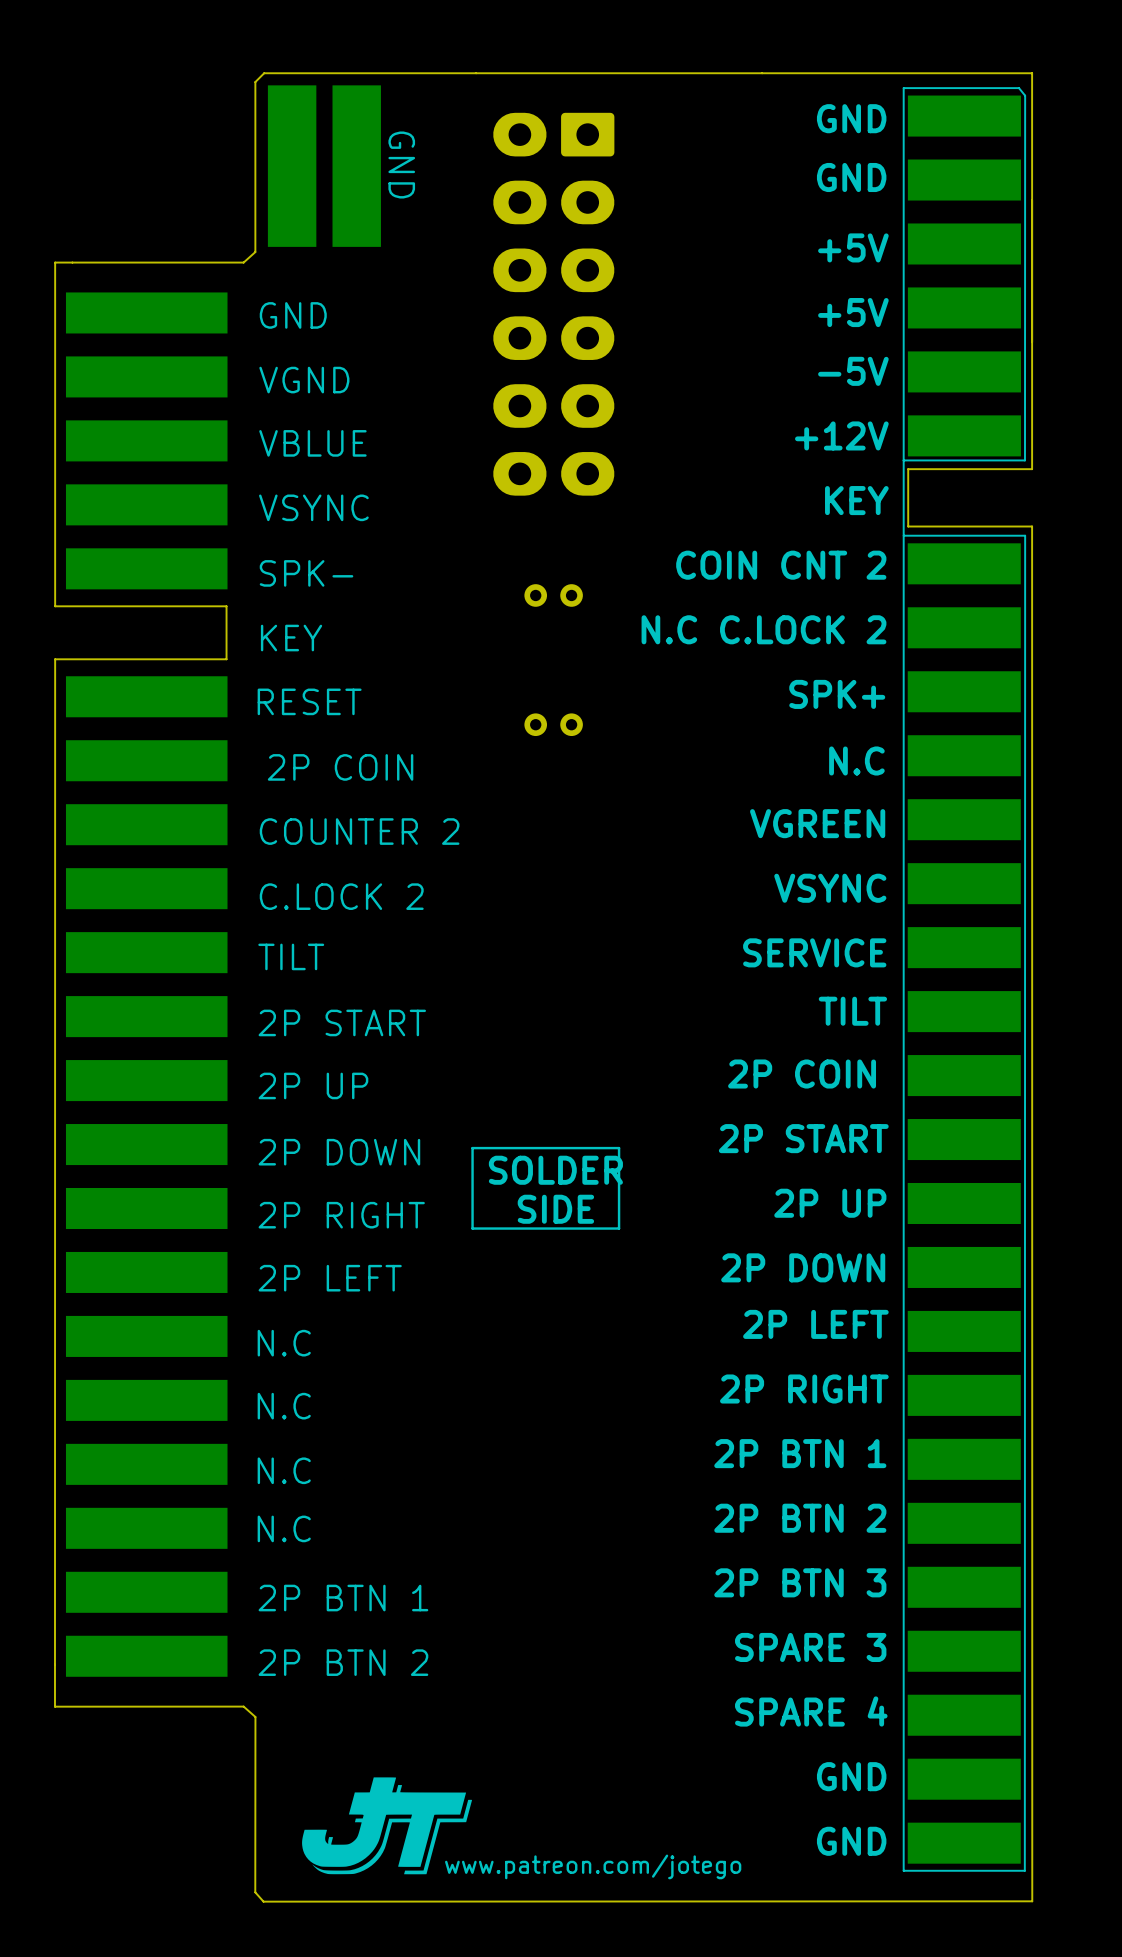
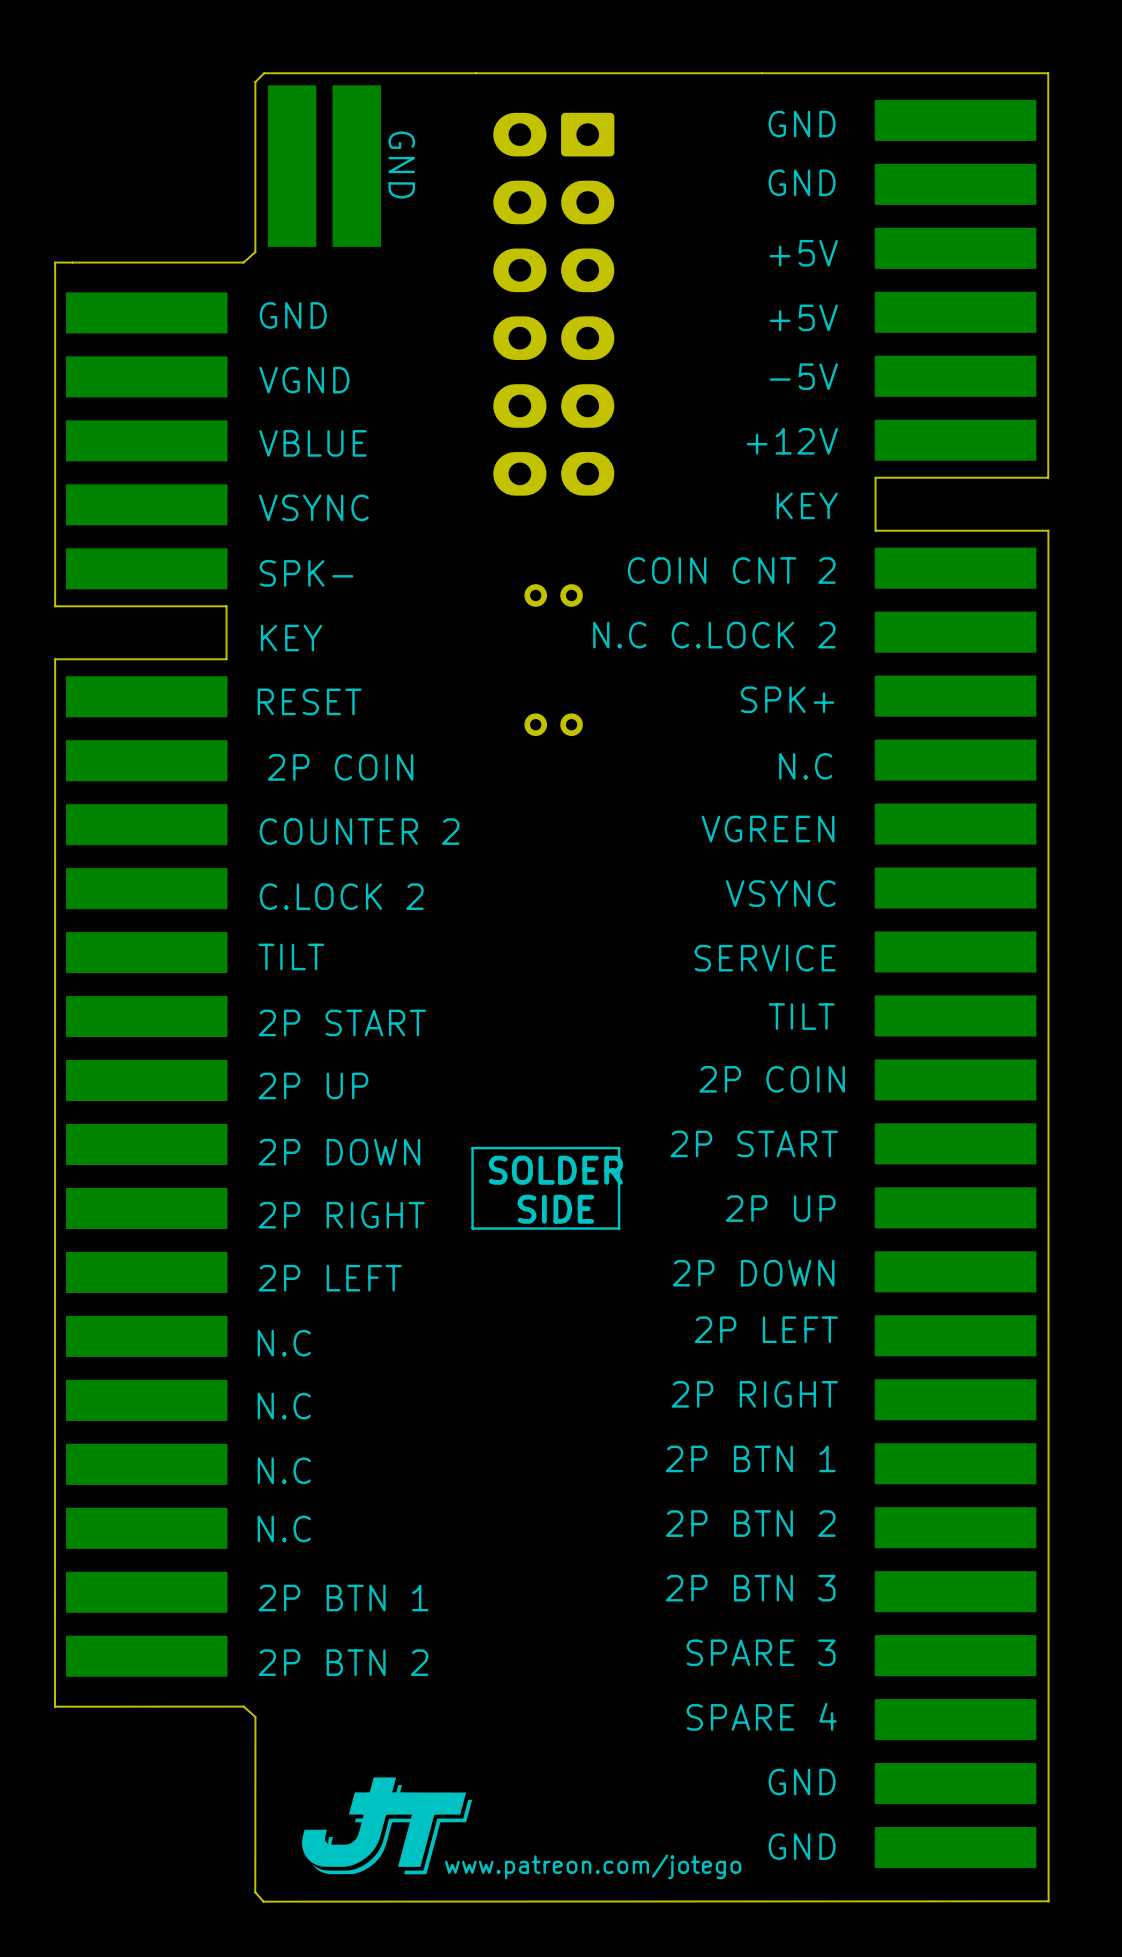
board edge: (1032, 73) (1032, 469) (908, 469) (908, 526) (1032, 526) (1032, 1901) -> (1032, 73) (1048, 73) (1048, 477) (875, 477) (875, 530) (1048, 530) (1048, 1901) (1032, 1901)
part footprint: [902, 87, 1027, 1872] -> [874, 99, 1037, 1869]

